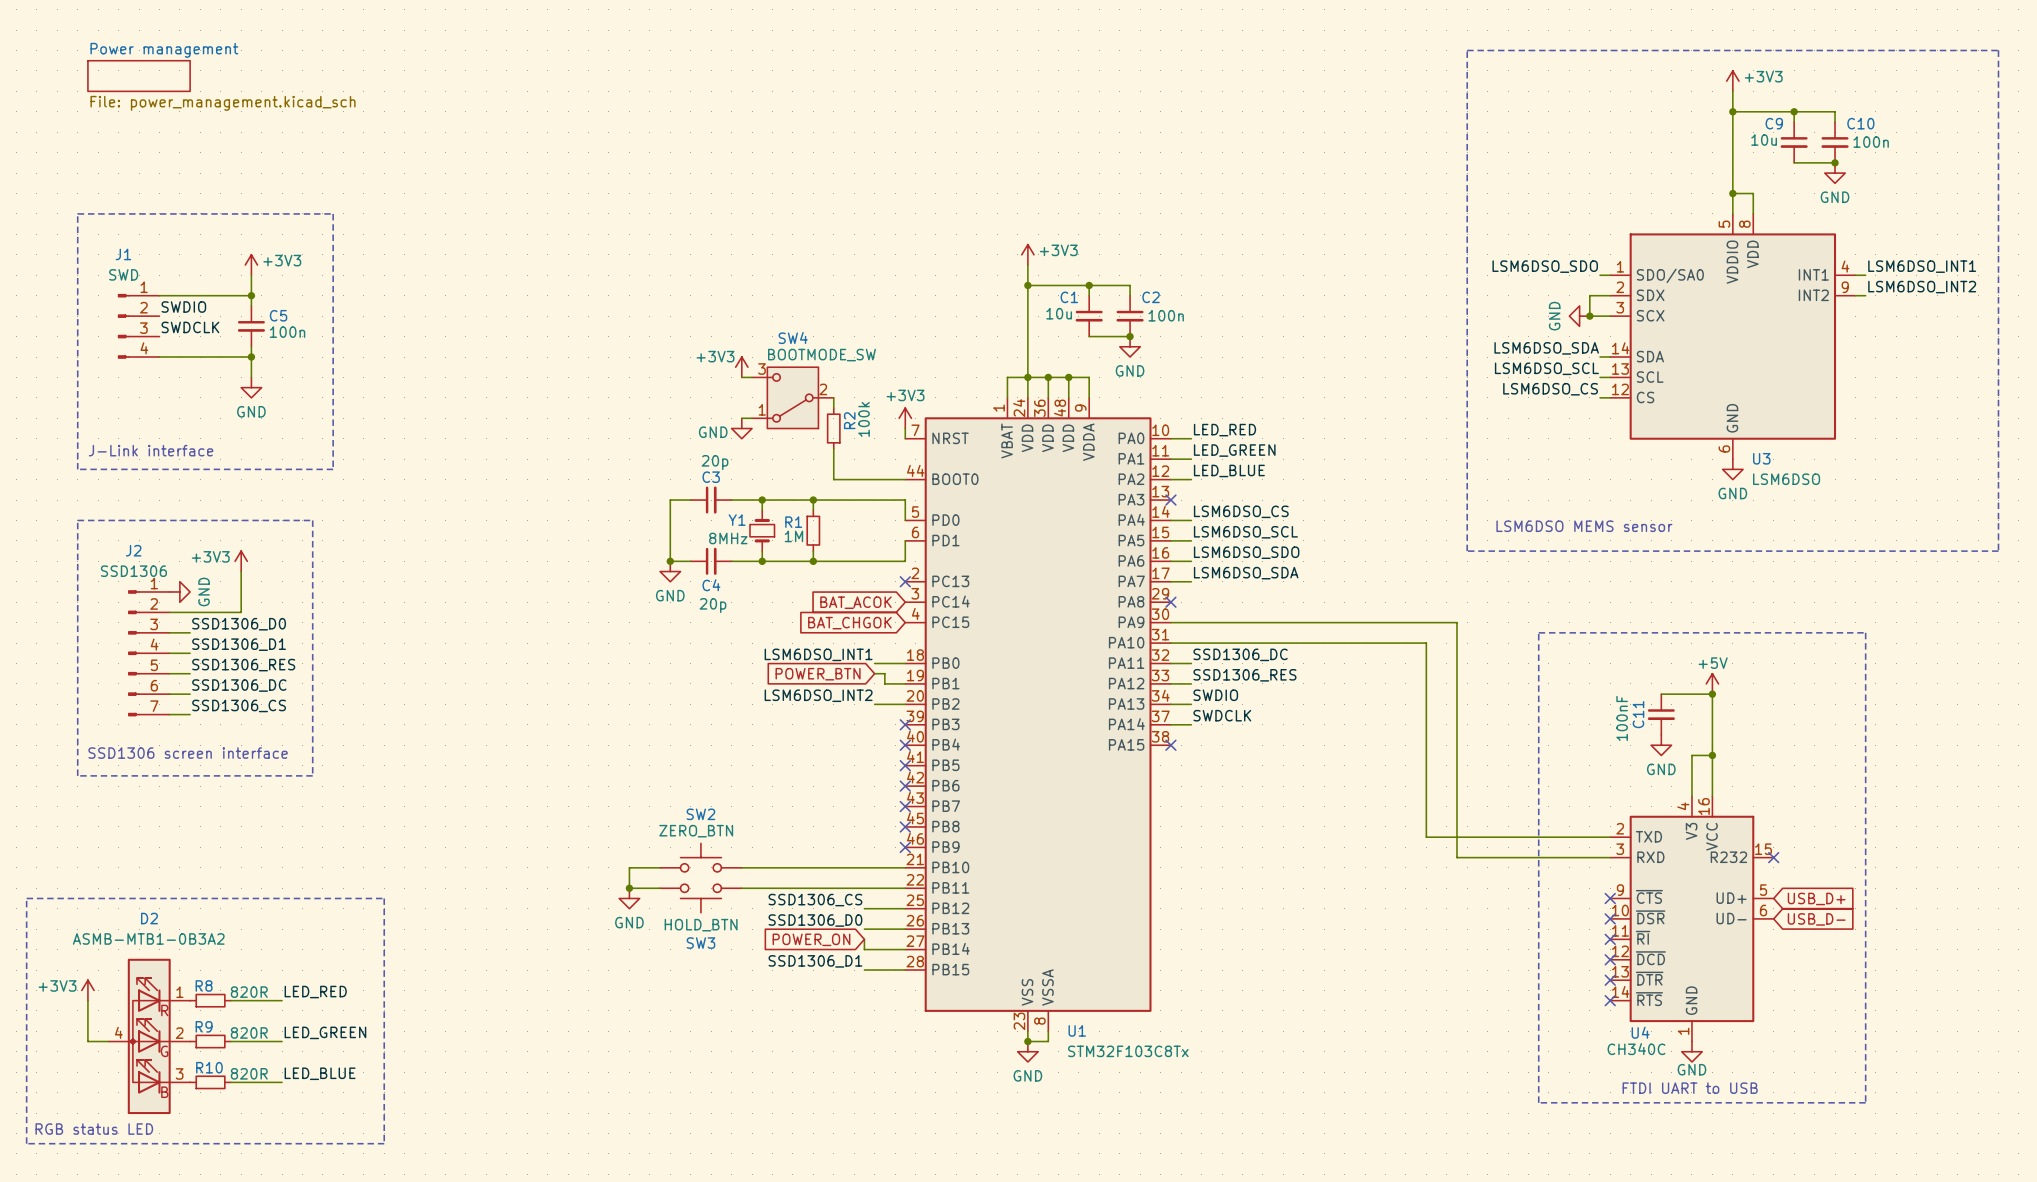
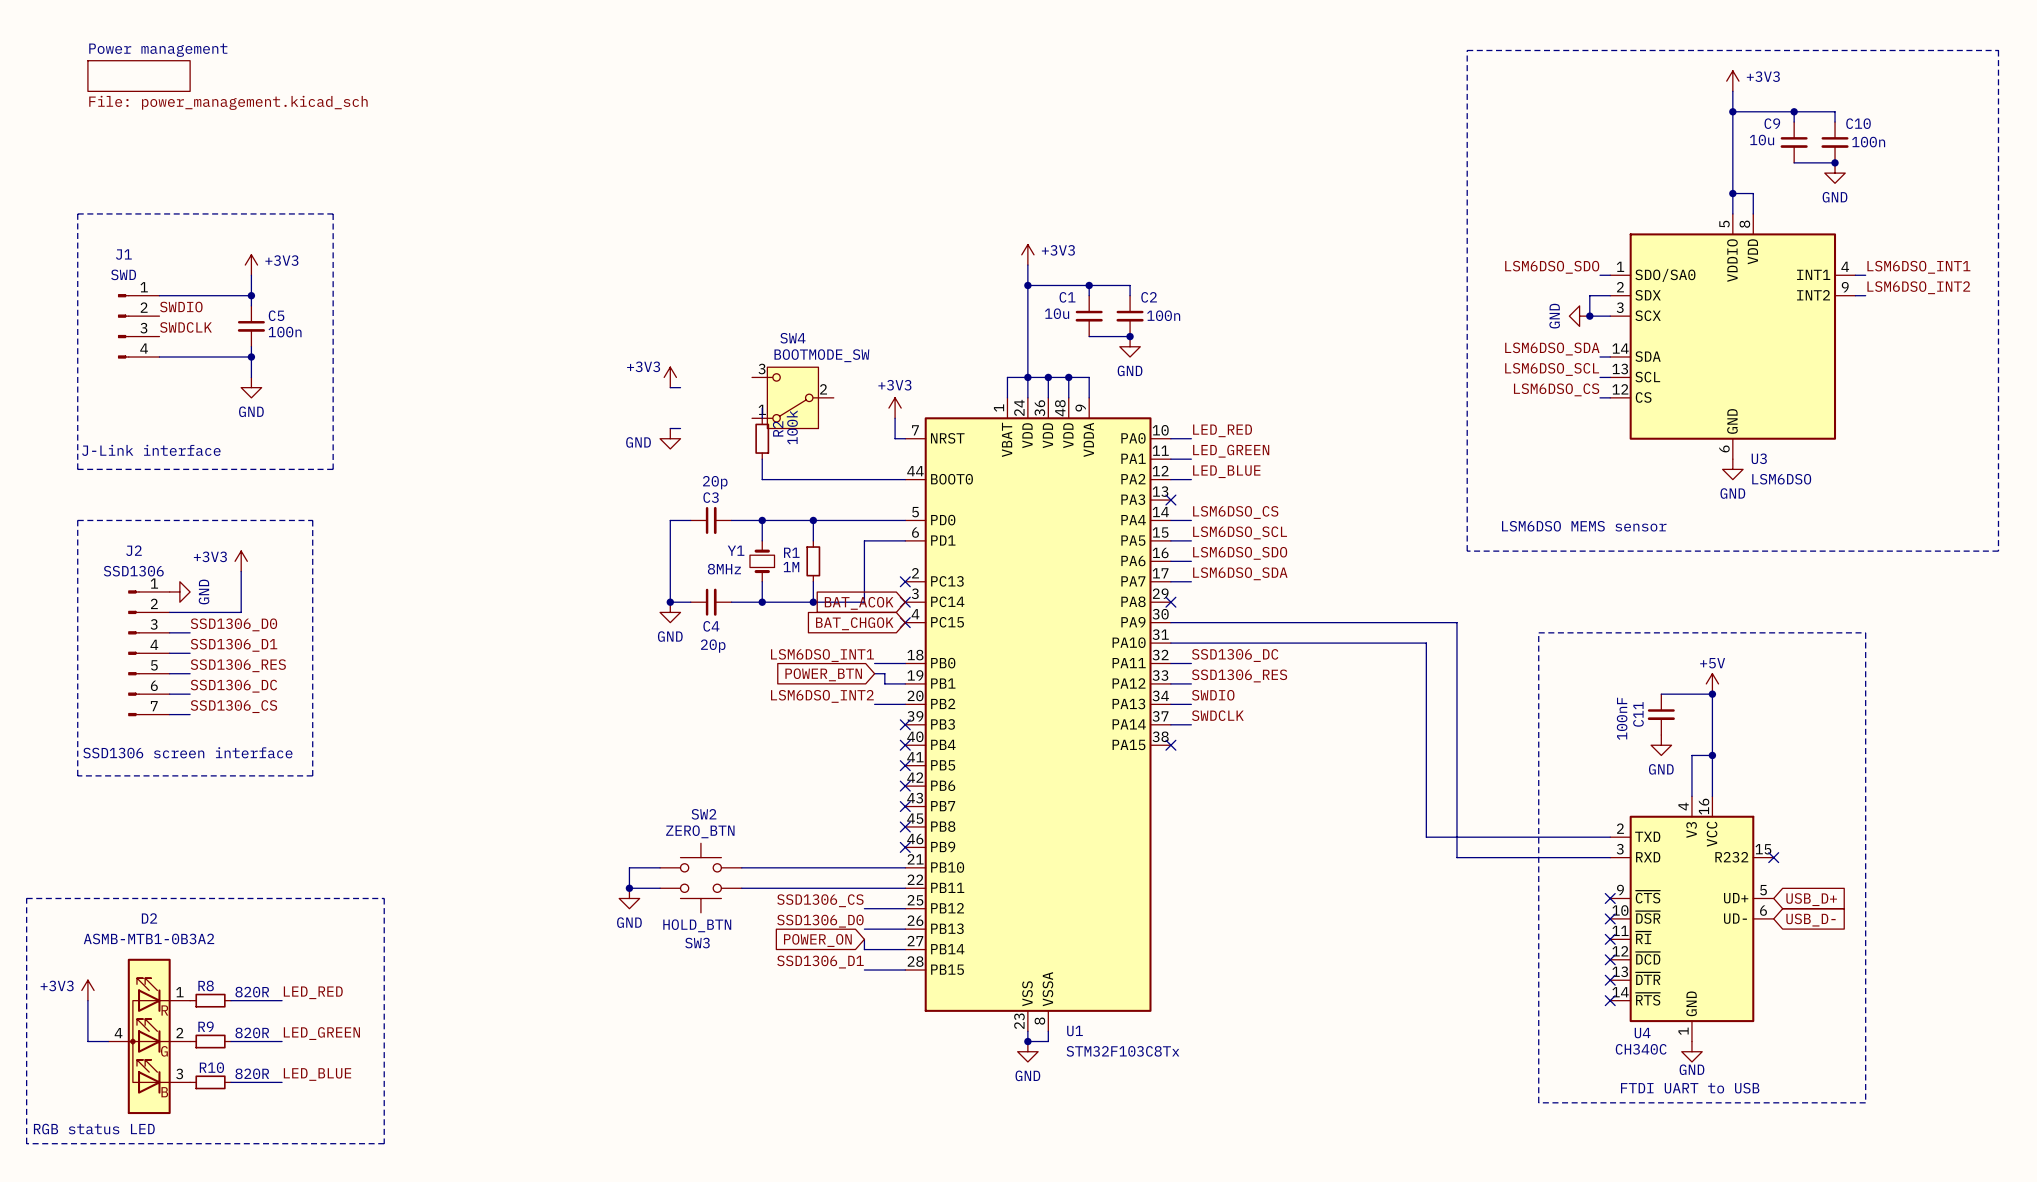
power symbol position: +3V3 (741, 367) -> +3V3 (670, 377)
wire: (741, 377) (752, 377) -> (670, 387) (680, 387)
wire: (833, 397) (833, 408) -> (762, 408) (762, 418)
wire: (741, 418) (752, 418) -> (670, 428) (680, 428)
power symbol position: +3V3 (905, 418) -> +3V3 (895, 408)
power symbol: GND (741, 428) -> none
R2 position: (833, 428) -> (762, 438)
wire: (905, 428) (905, 438) -> (895, 418) (895, 438) (905, 438)
power symbol: none -> GND (670, 438)
wire: (833, 448) (833, 479) -> (762, 459) (762, 479) (833, 479)
wire: (690, 500) (670, 500) (670, 520) -> (690, 520) (670, 520)
C3 position: (711, 500) -> (711, 520)
wire: (731, 500) (905, 500) (905, 520) -> (731, 520) (905, 520)
wire: (762, 500) (762, 510) -> none
junction: (762, 500) -> none
wire: (813, 500) (813, 510) -> none
junction: (813, 500) -> none
wire: none -> (762, 520) (762, 540)
junction: none -> (762, 520)
wire: none -> (813, 520) (813, 540)
junction: none -> (813, 520)
Y1 position: (762, 530) -> (762, 561)
R1 position: (813, 530) -> (813, 561)
wire: (905, 540) (905, 561) (731, 561) -> (905, 540) (864, 540) (864, 602) (731, 602)
wire: (762, 551) (762, 561) -> none
wire: (813, 551) (813, 561) -> none
wire: (670, 561) (690, 561) -> (670, 561) (670, 602) (690, 602)
junction position: (670, 561) -> (670, 602)
C4 position: (711, 561) -> (711, 602)
junction: (762, 561) -> none
junction: (813, 561) -> none
power symbol position: GND (670, 571) -> GND (670, 612)
wire: none -> (762, 581) (762, 602)
wire: none -> (813, 581) (813, 602)
junction: none -> (762, 602)
junction: none -> (813, 602)
no-connect mark: none -> (905, 602)
no-connect mark: none -> (905, 622)

